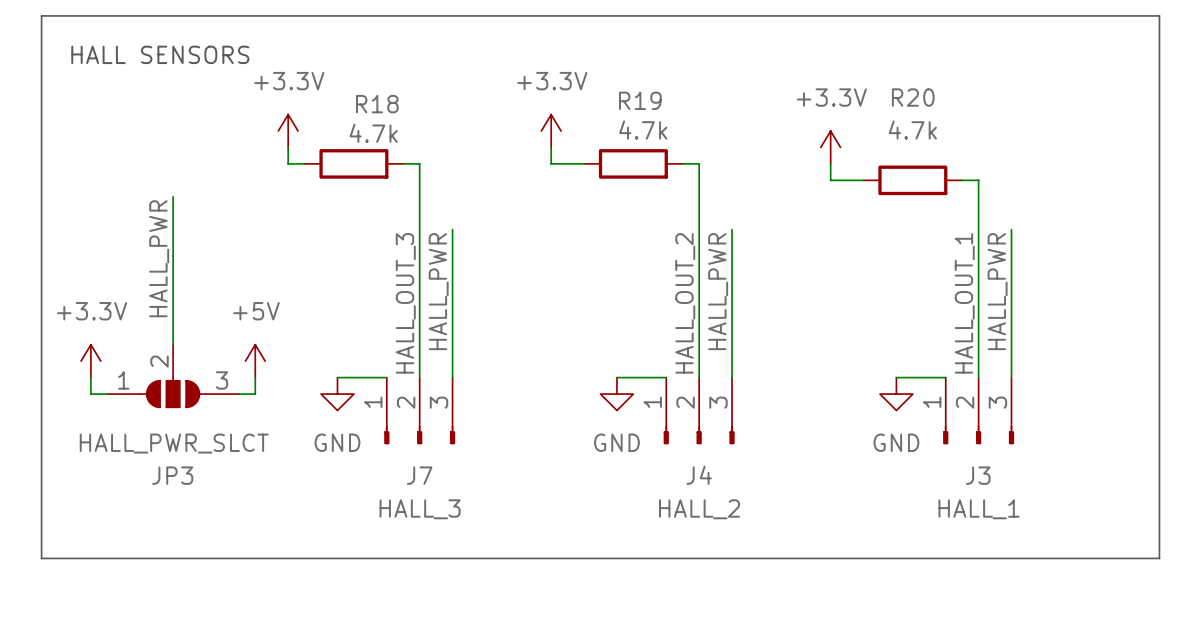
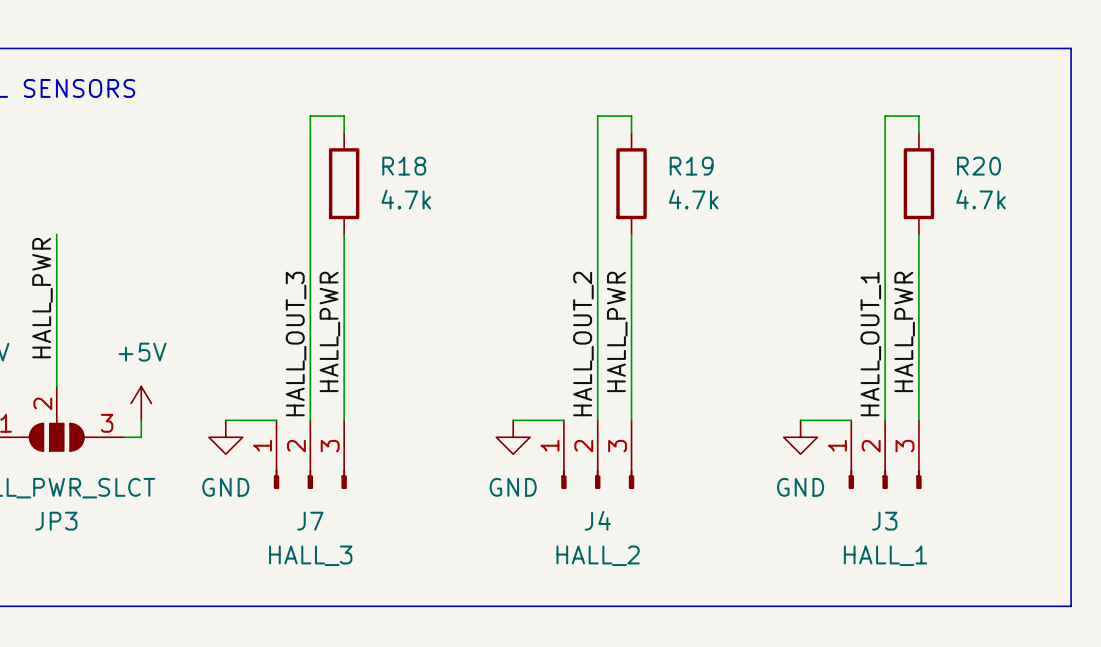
R20 name position: R20 (913, 97) -> R20 (979, 166)
R18 name position: R18 (377, 104) -> R18 (404, 166)
R19 value position: 4.7k (643, 130) -> 4.7k (693, 199)
power symbol: +3.3V (288, 131) -> none
power symbol: +3.3V (551, 131) -> none
R18 value position: 4.7k (373, 133) -> 4.7k (406, 199)
wire: (288, 147) (288, 163) (304, 163) -> none
wire: (551, 147) (551, 163) (584, 163) -> none
power symbol: +3.3V (830, 147) -> none
R18 rotation: 0° (353, 163) -> 90° clockwise (344, 183)
R18 position: (353, 163) -> (344, 183)
wire: (403, 163) (419, 163) -> (344, 132) (344, 116) (310, 116) (310, 200)
R19 rotation: 0° (633, 163) -> 90° clockwise (631, 183)
R19 position: (633, 163) -> (631, 183)
wire: (682, 163) (699, 163) -> (631, 132) (631, 116) (597, 116) (597, 200)
wire: (830, 163) (830, 180) (863, 180) -> none
R20 rotation: 0° (912, 180) -> 90° clockwise (918, 183)
R20 position: (912, 180) -> (918, 183)
wire: (962, 180) (978, 180) -> (918, 132) (918, 116) (885, 116) (885, 217)
wire: none -> (344, 234) (344, 268)
wire: none -> (631, 234) (631, 268)
wire: none -> (918, 234) (918, 268)

